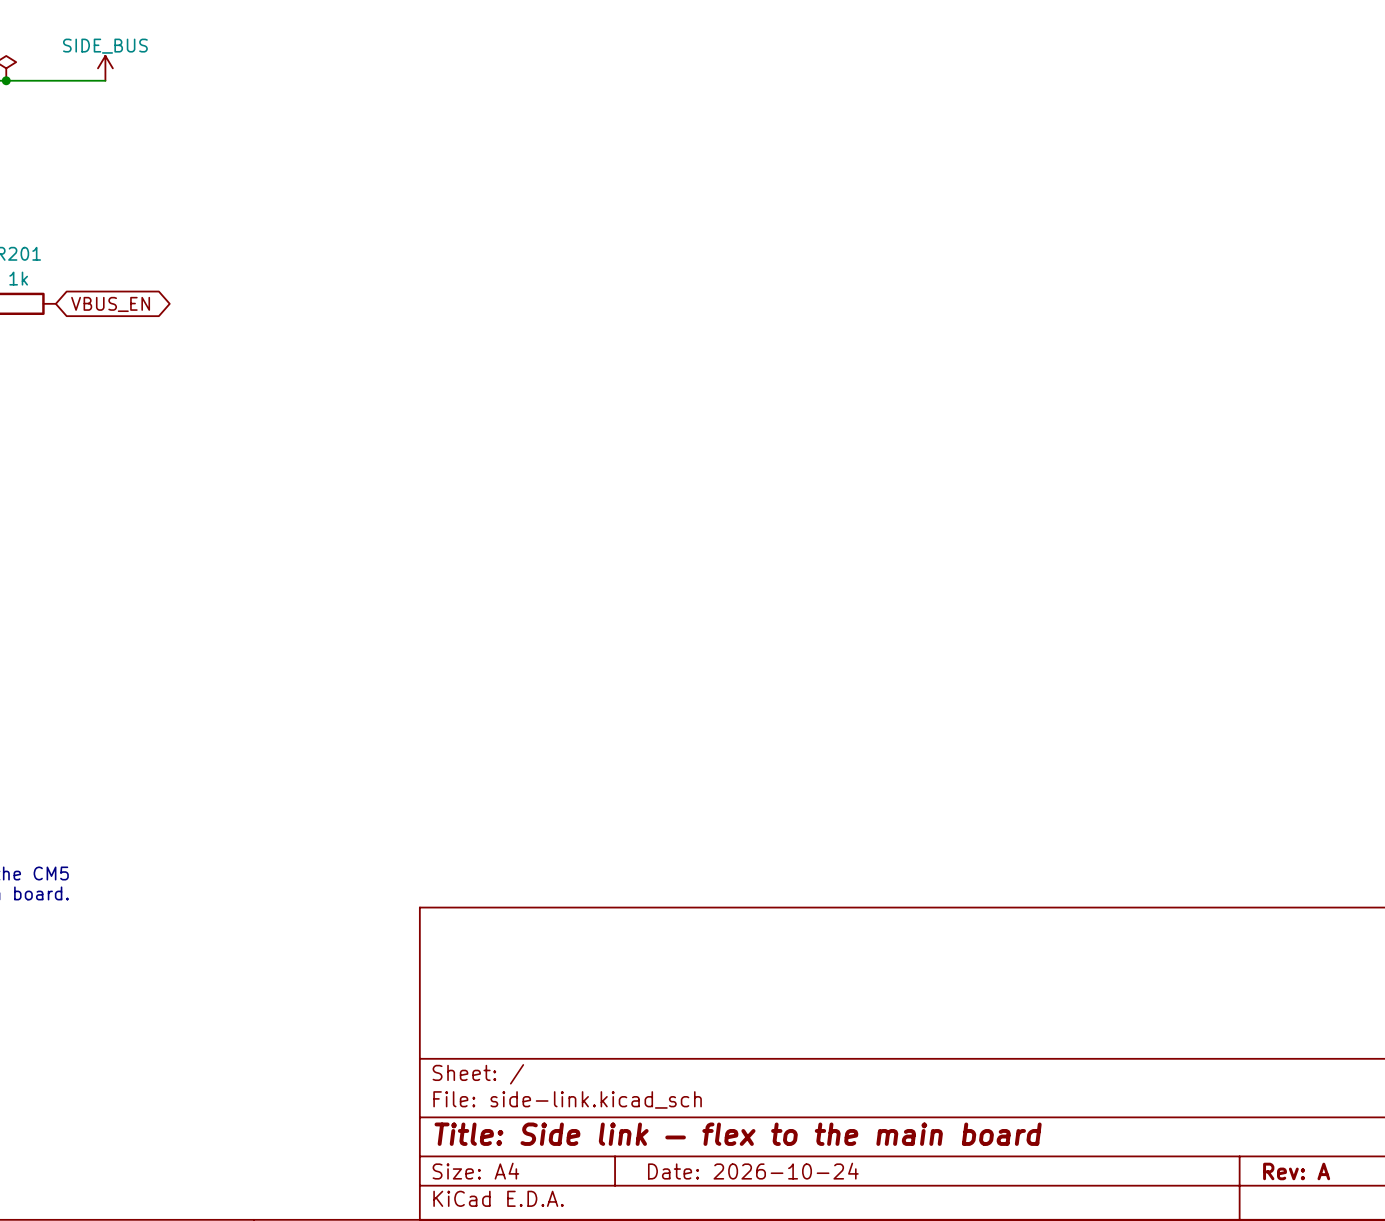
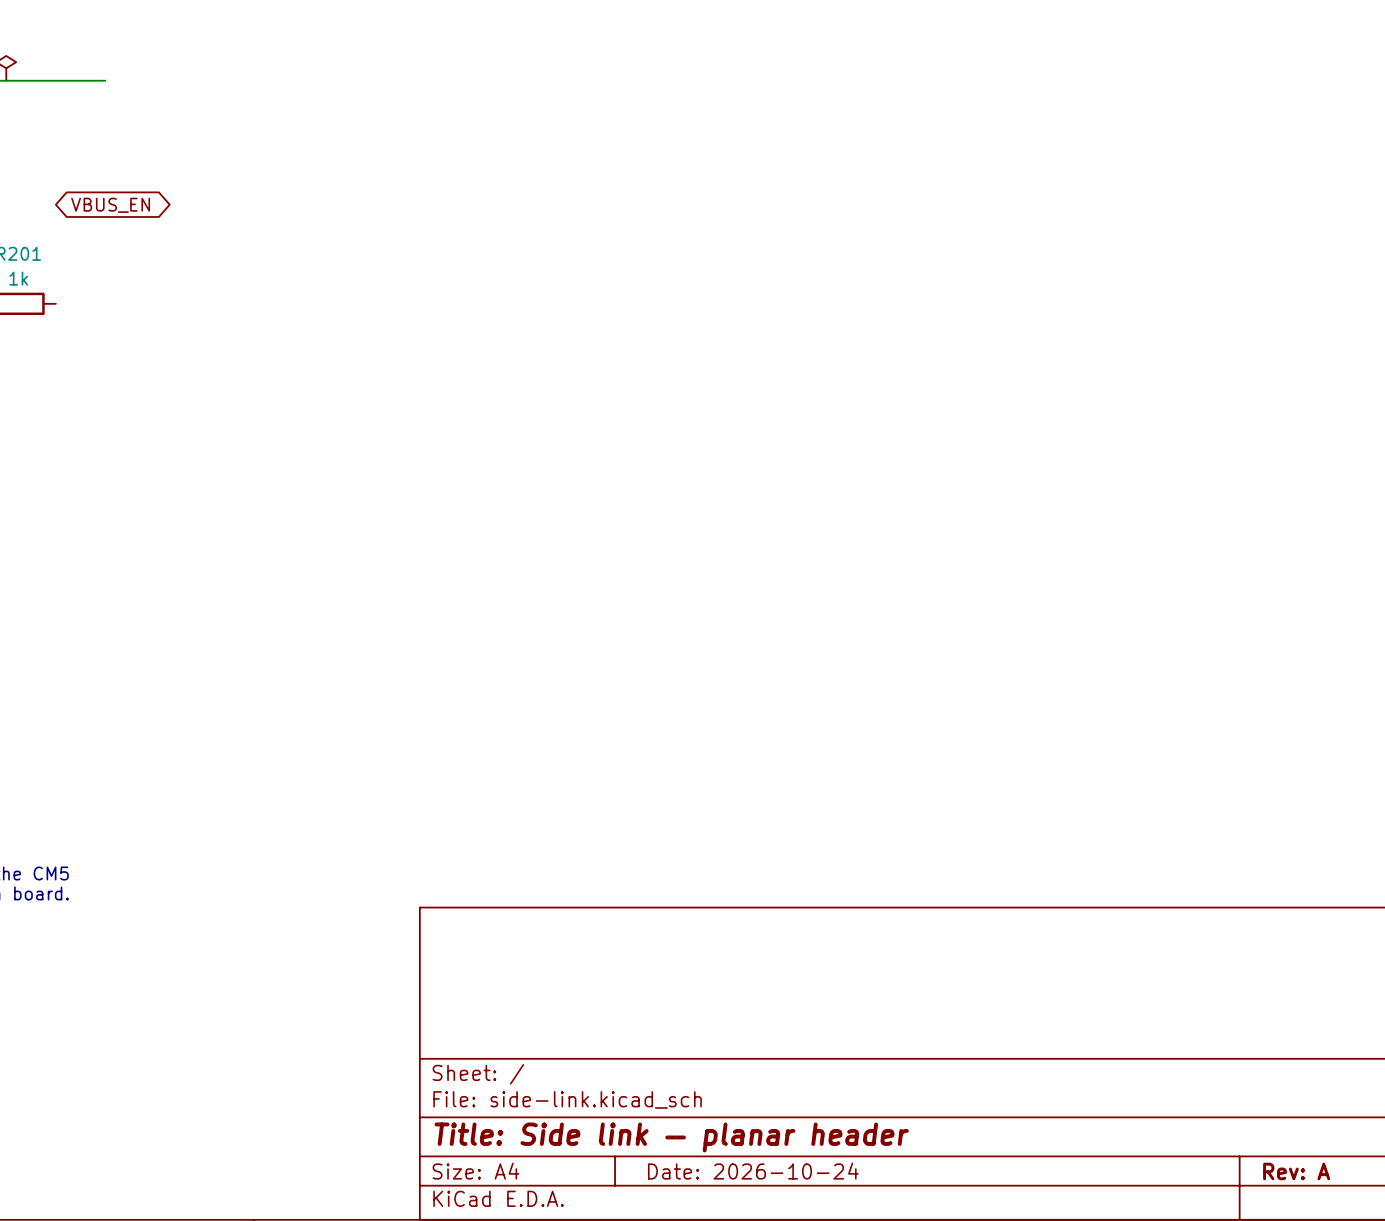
power symbol: SIDE_BUS (105, 68) -> none
junction: (6, 80) -> none
global label position: VBUS_EN (110, 304) -> VBUS_EN (110, 205)
title block: Title: Side link — flex to the main board (738, 1134) -> Title: Side link — planar header (671, 1137)

